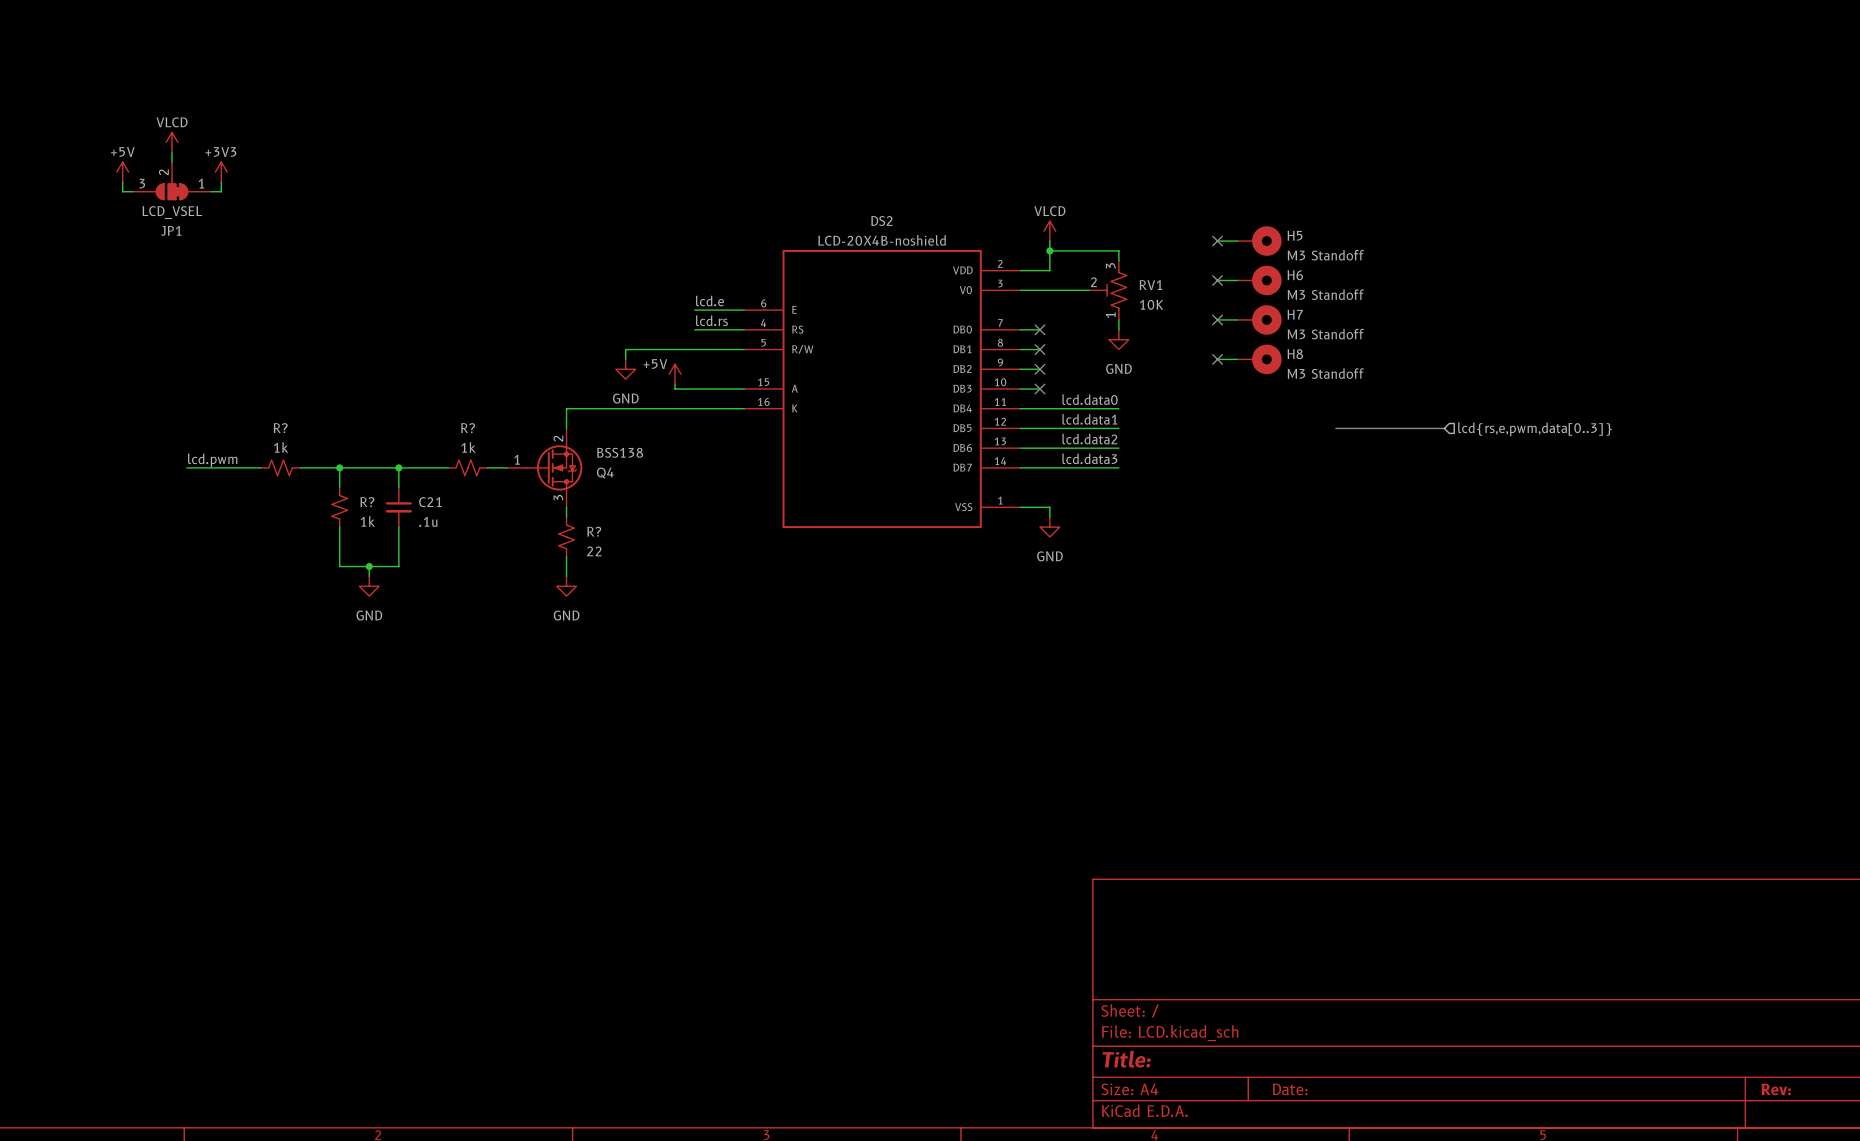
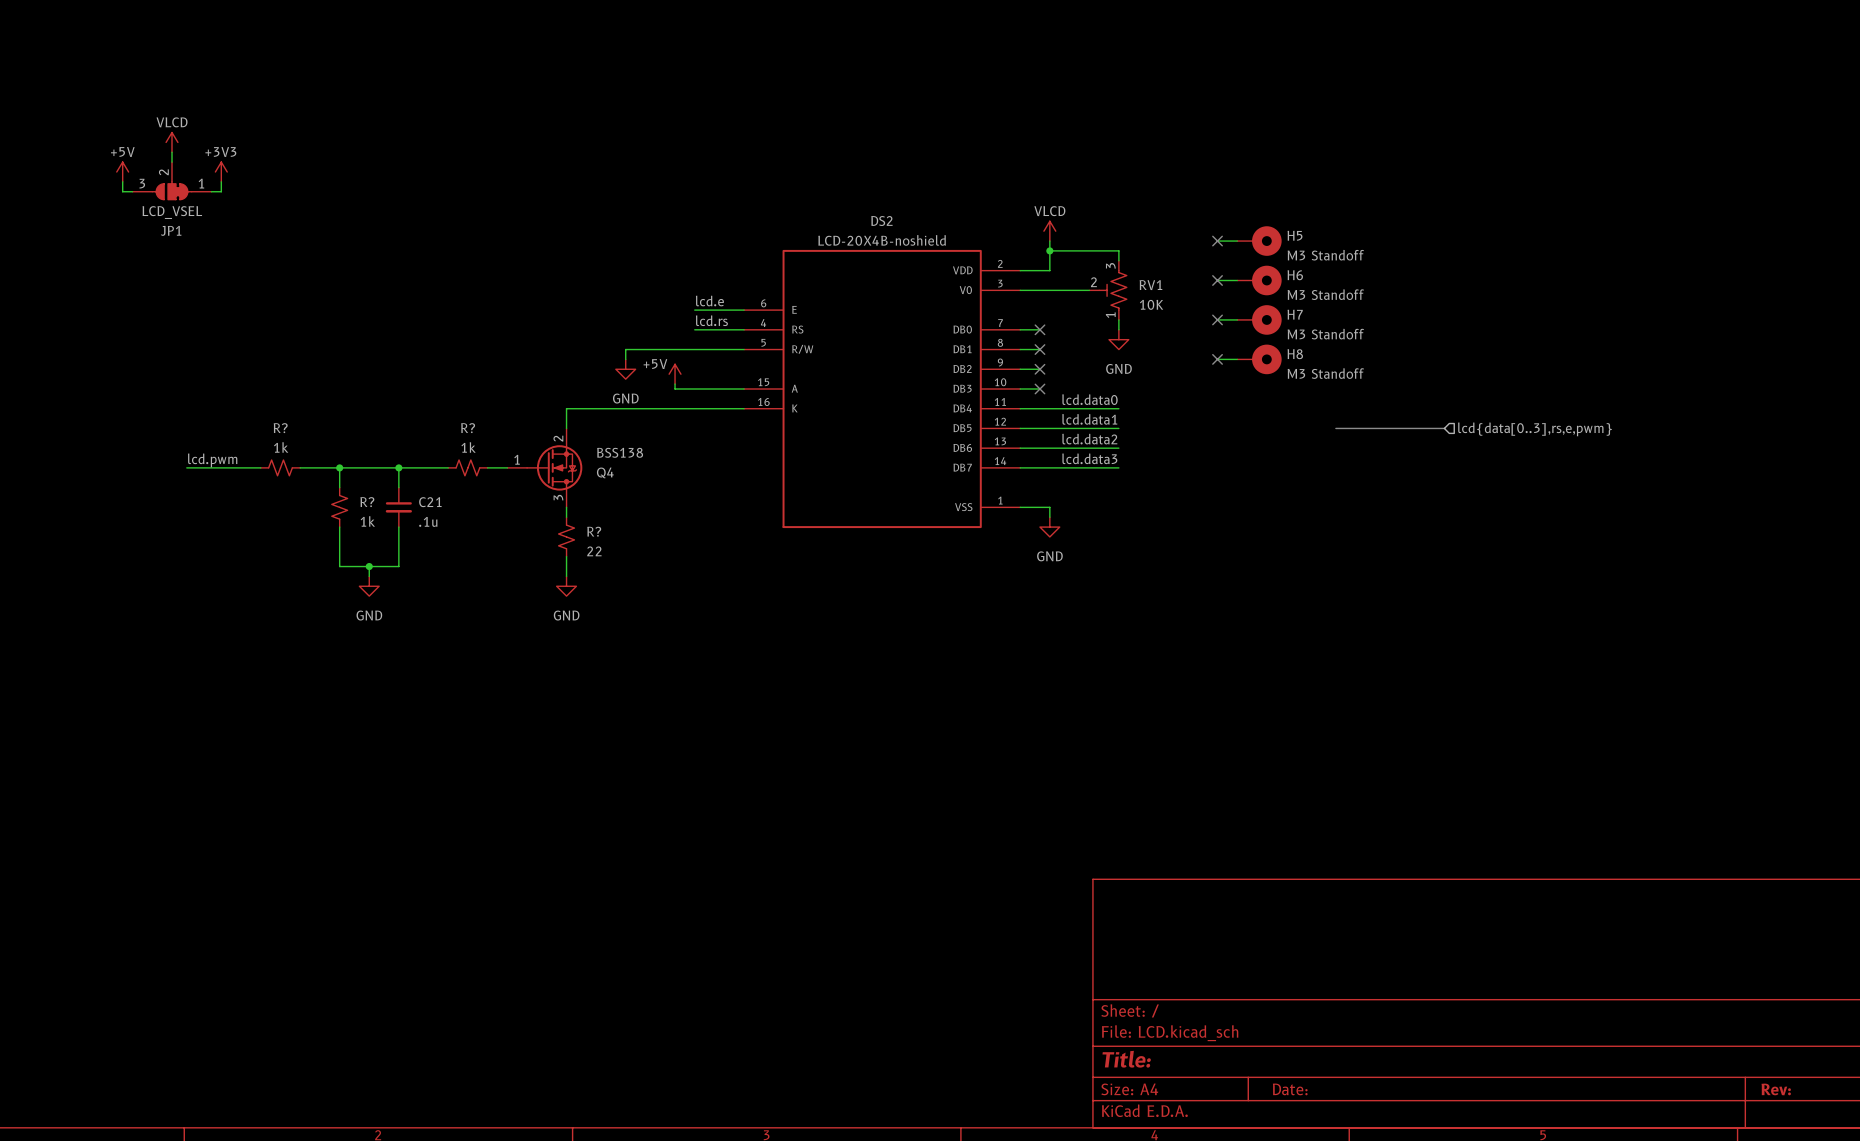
hierarchical label: lcd{rs,e,pwm,data[0..3]} (1534, 429) -> lcd{data[0..3],rs,e,pwm} (1534, 429)

